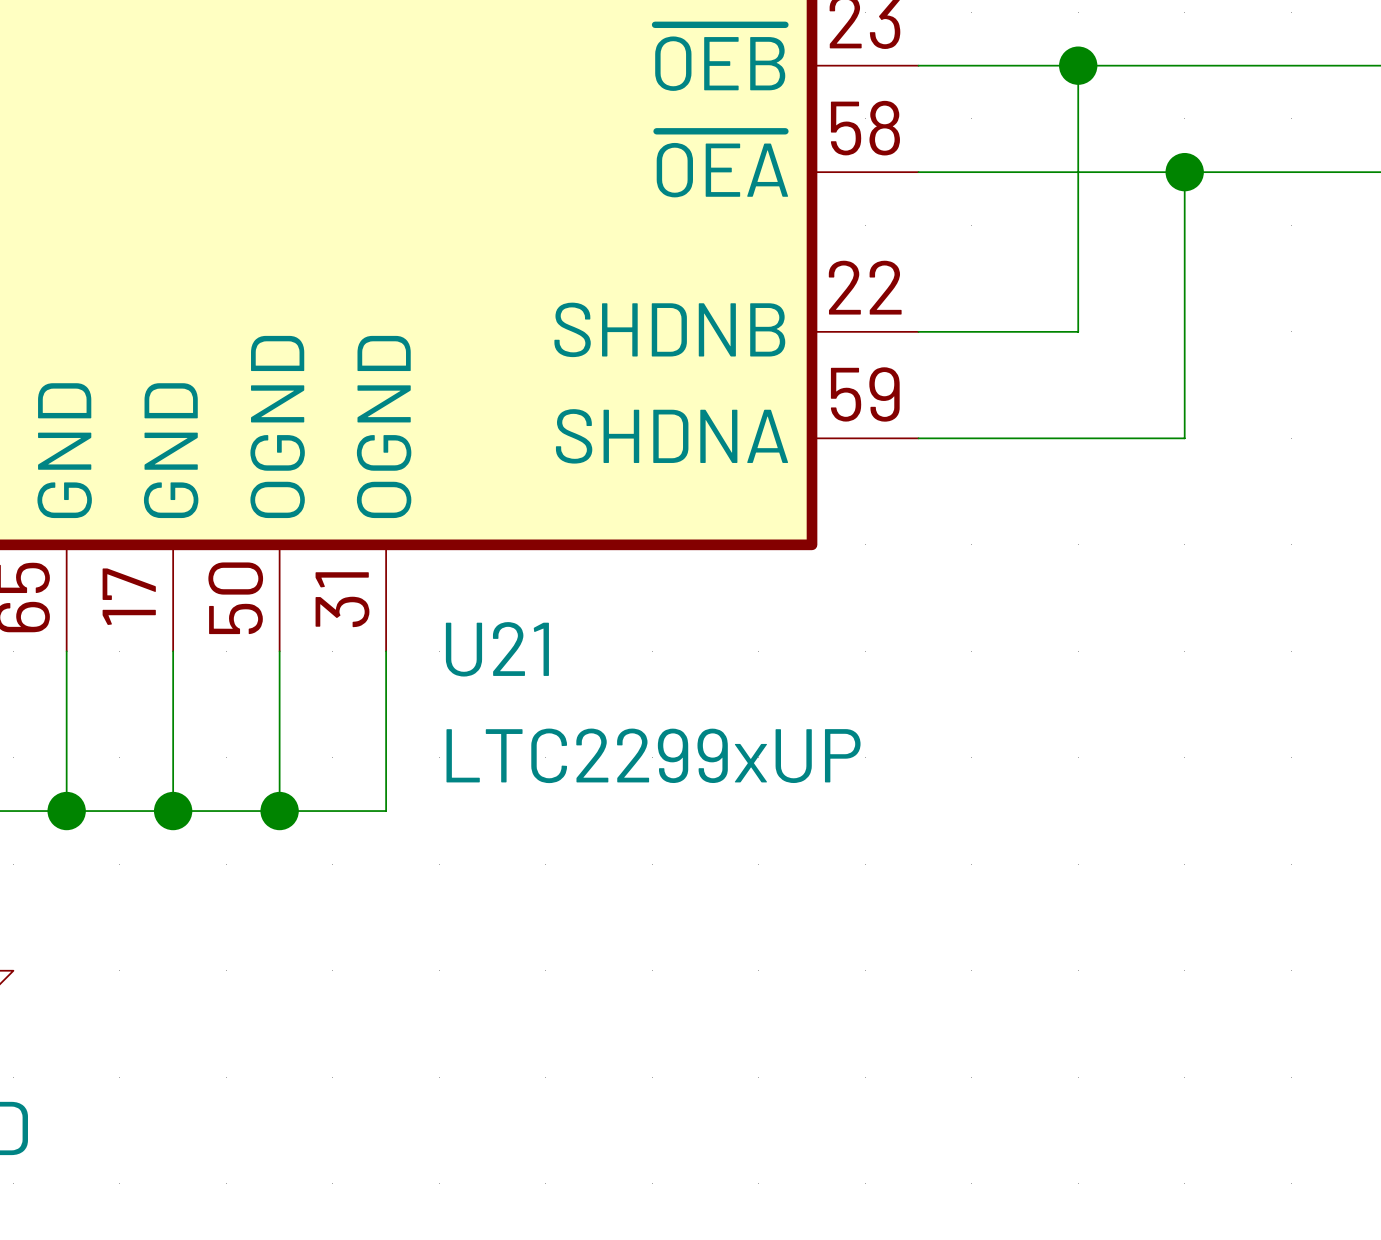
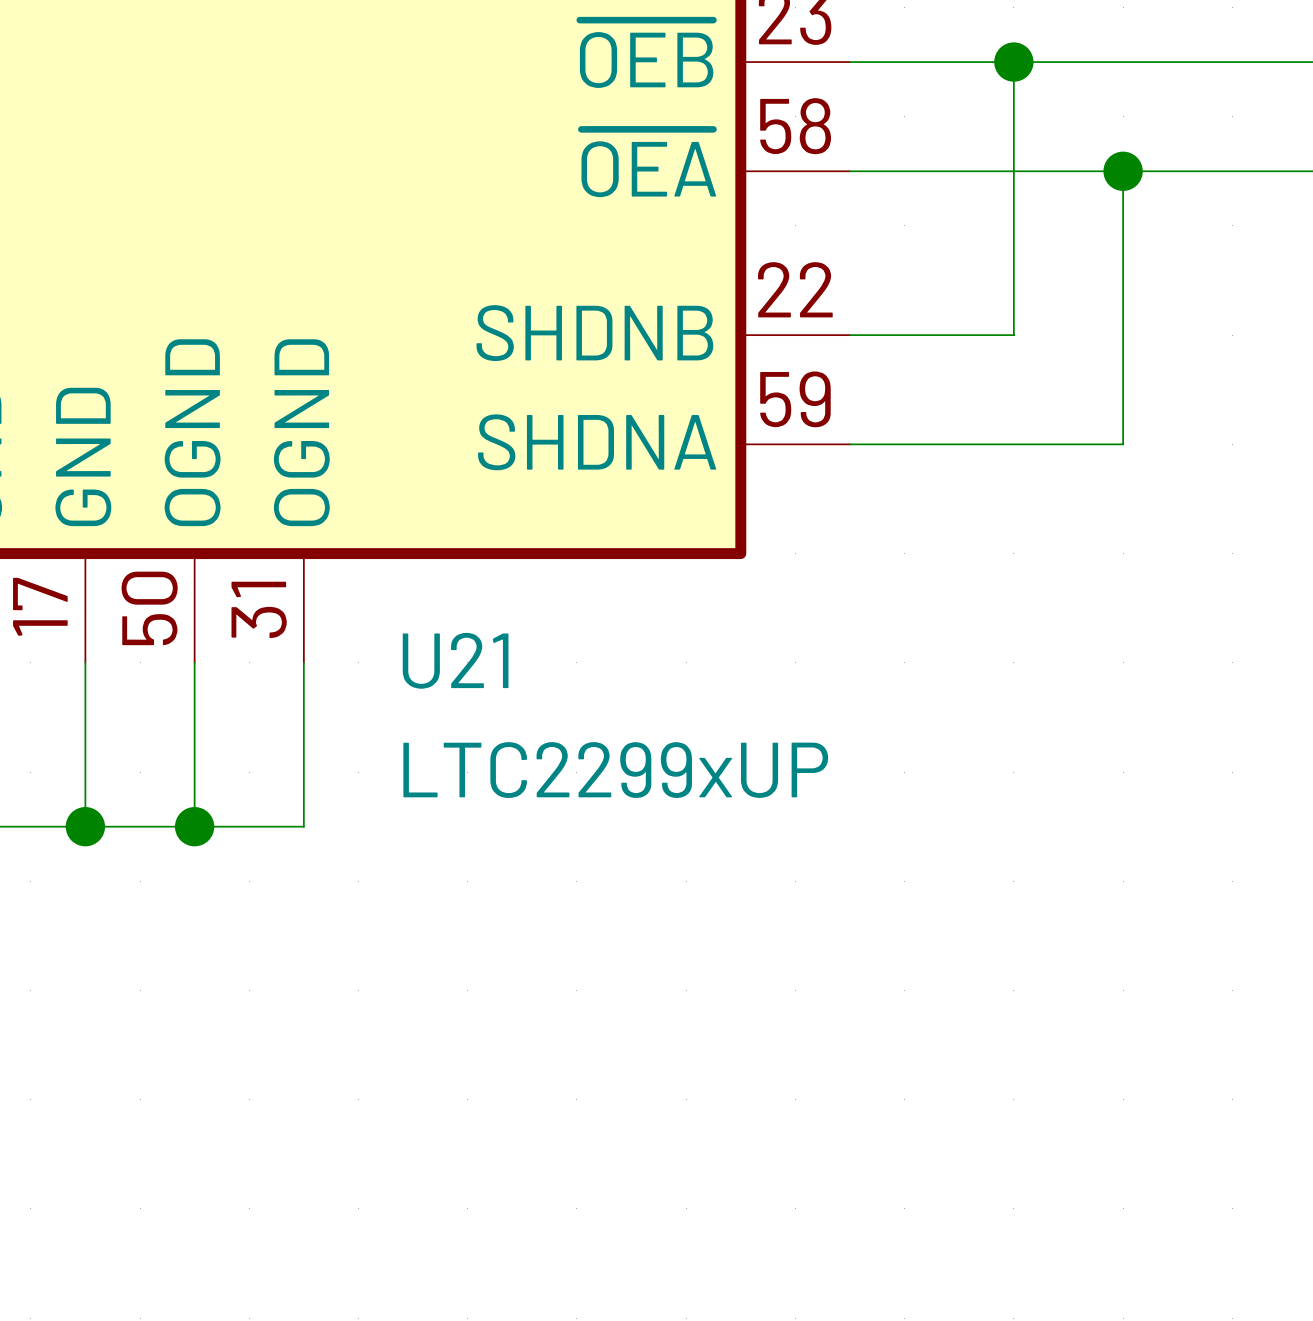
U21 name position: U21 (497, 649) -> U21 (455, 660)
U21 value position: LTC2299xUP (653, 755) -> LTC2299xUP (615, 770)

